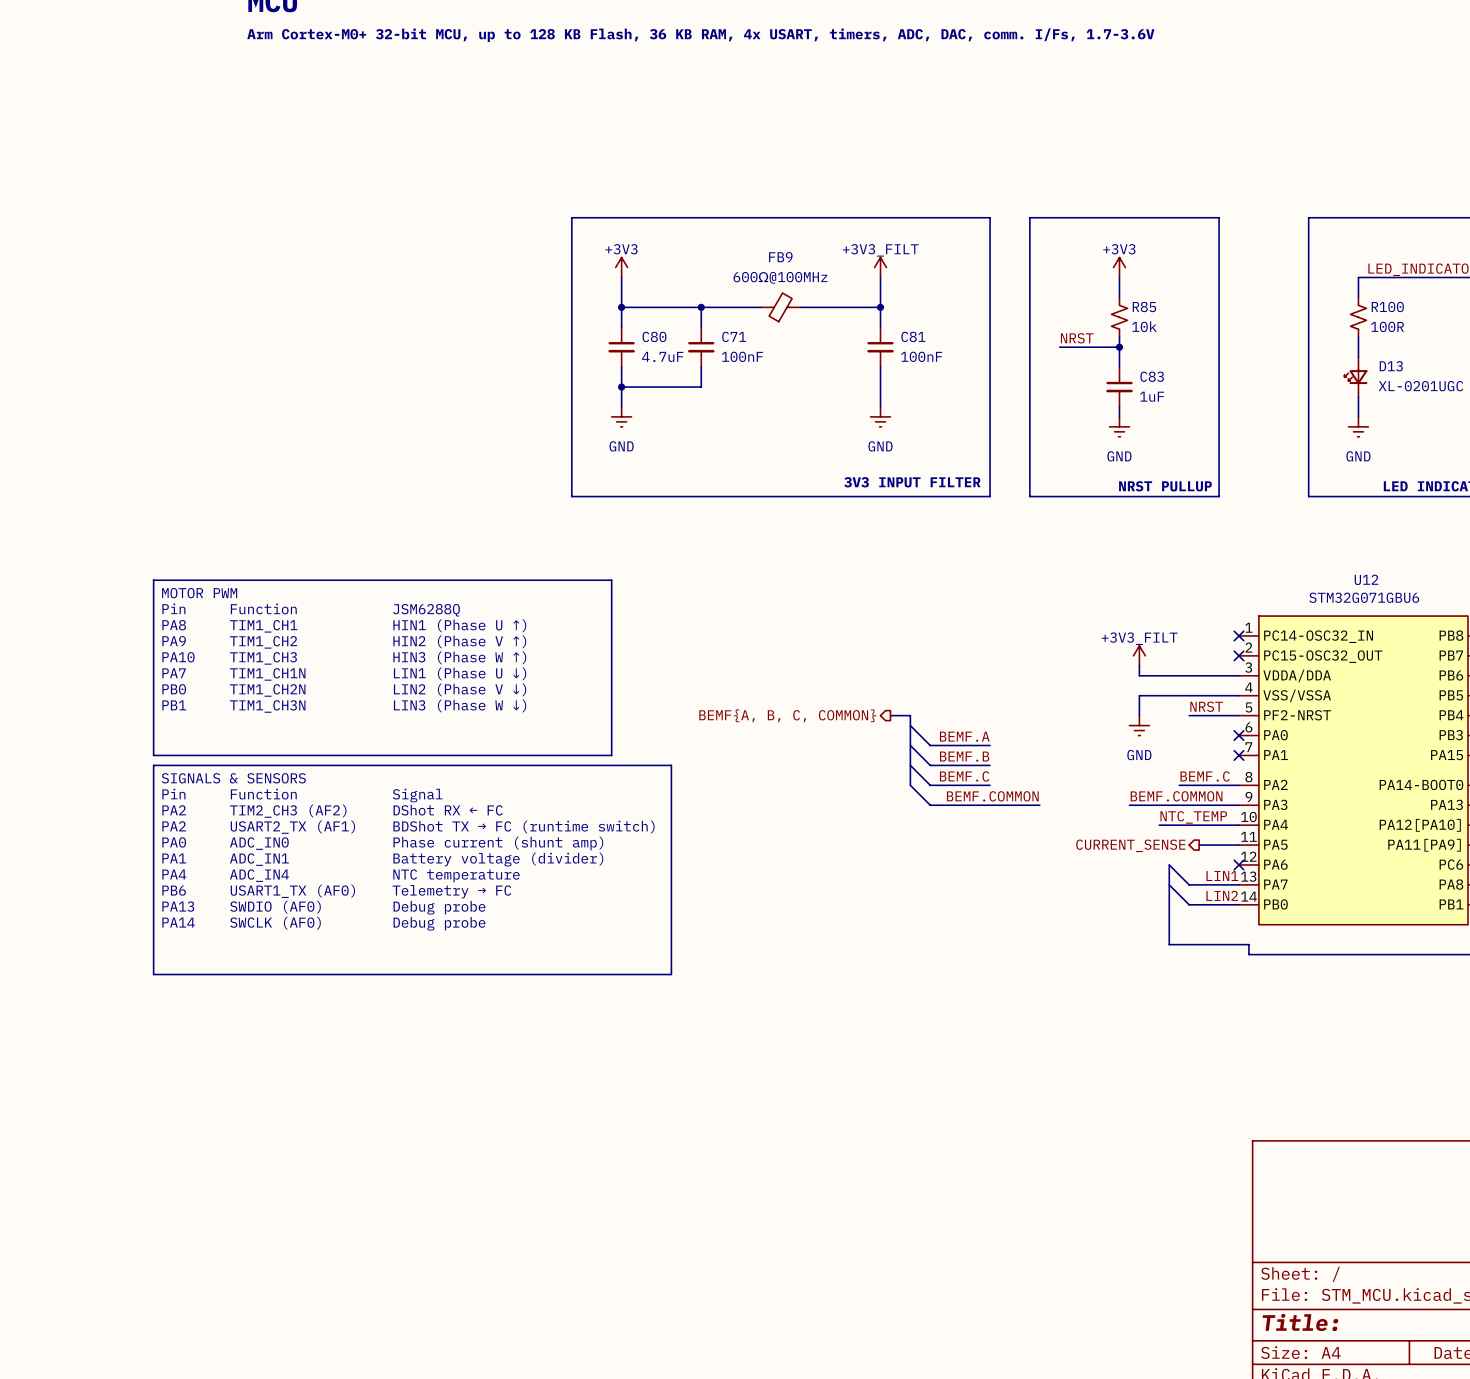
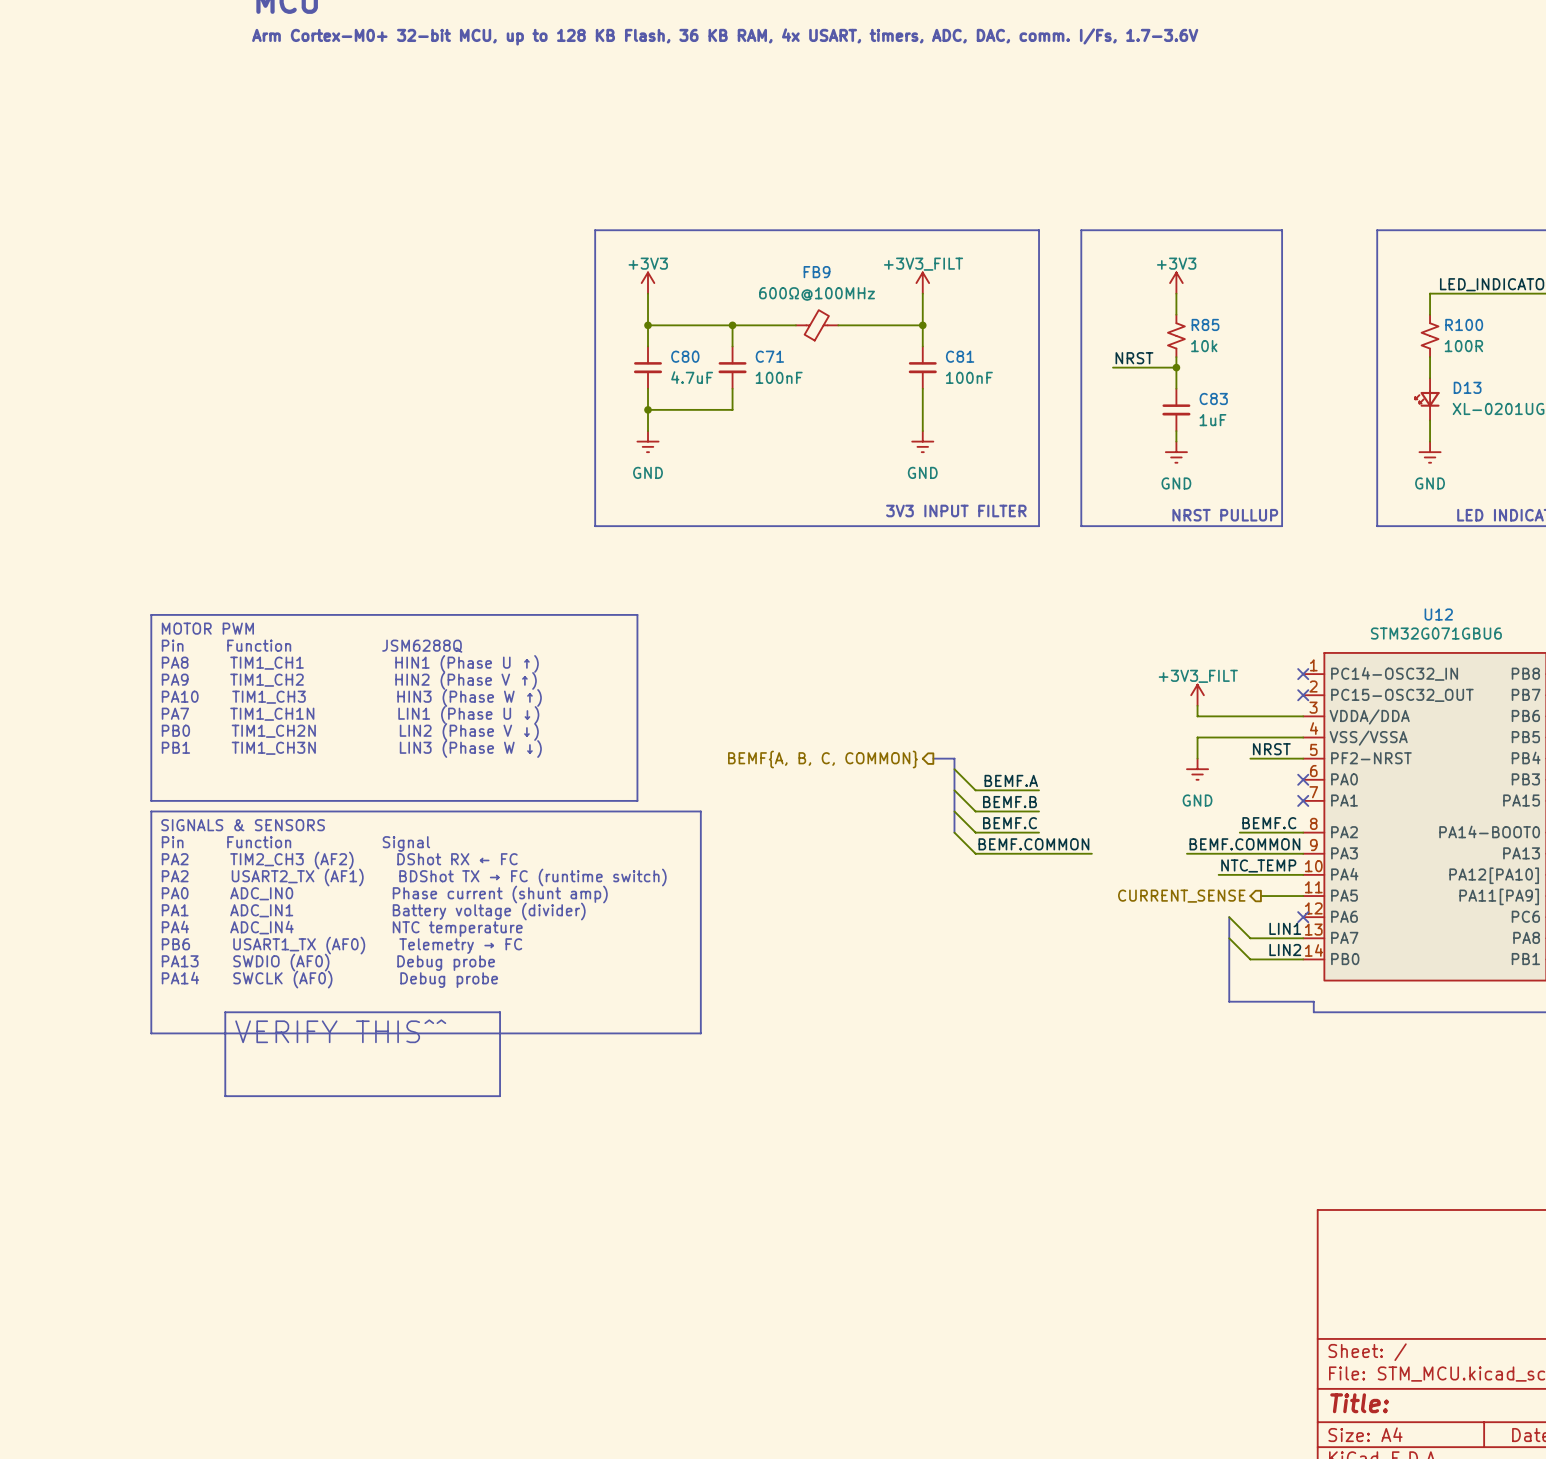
line: none -> (225, 1012) (500, 1012) (500, 1096) (225, 1096) (225, 1012)
text: none -> VERIFY THIS^^ (340, 1031)

